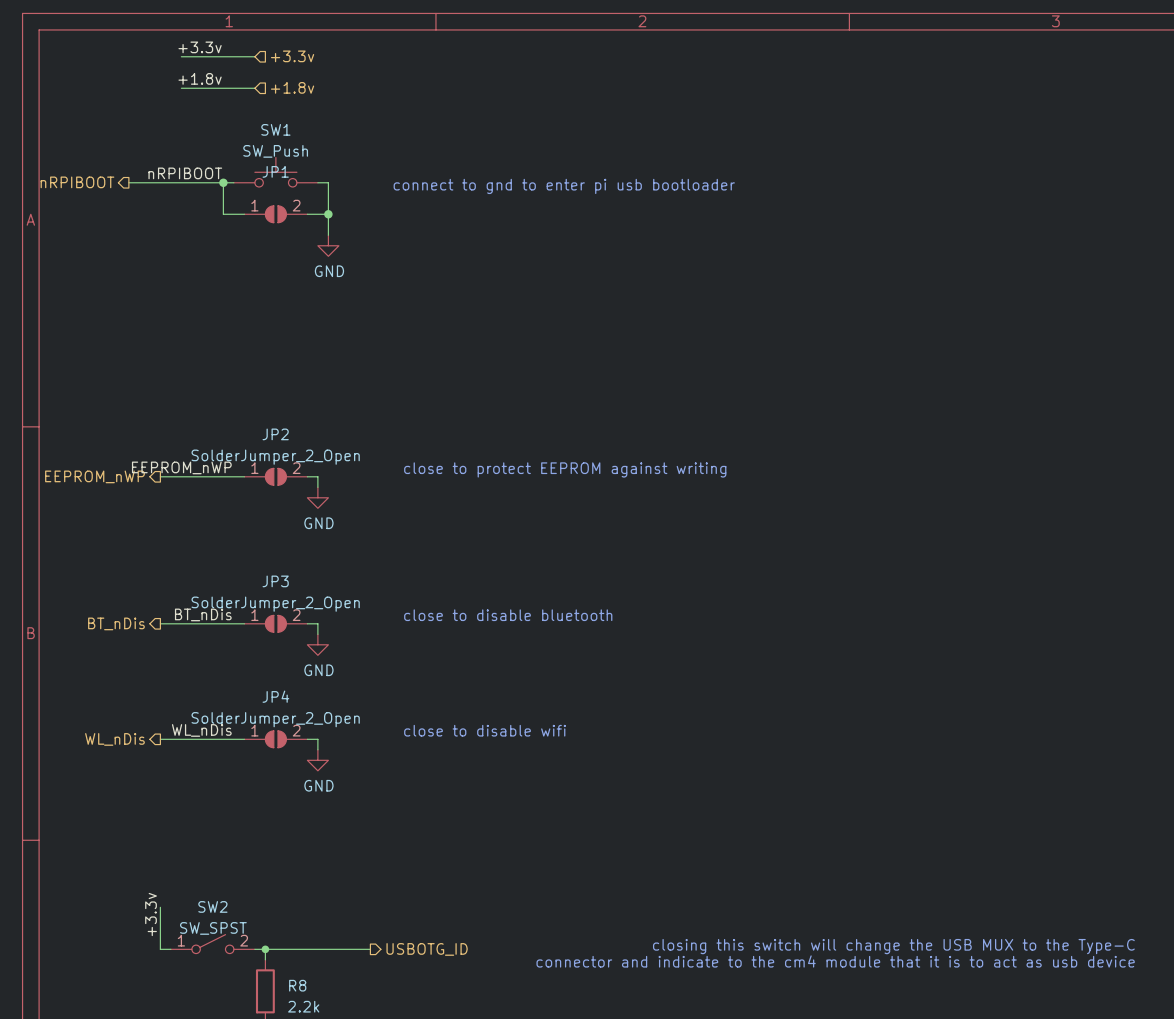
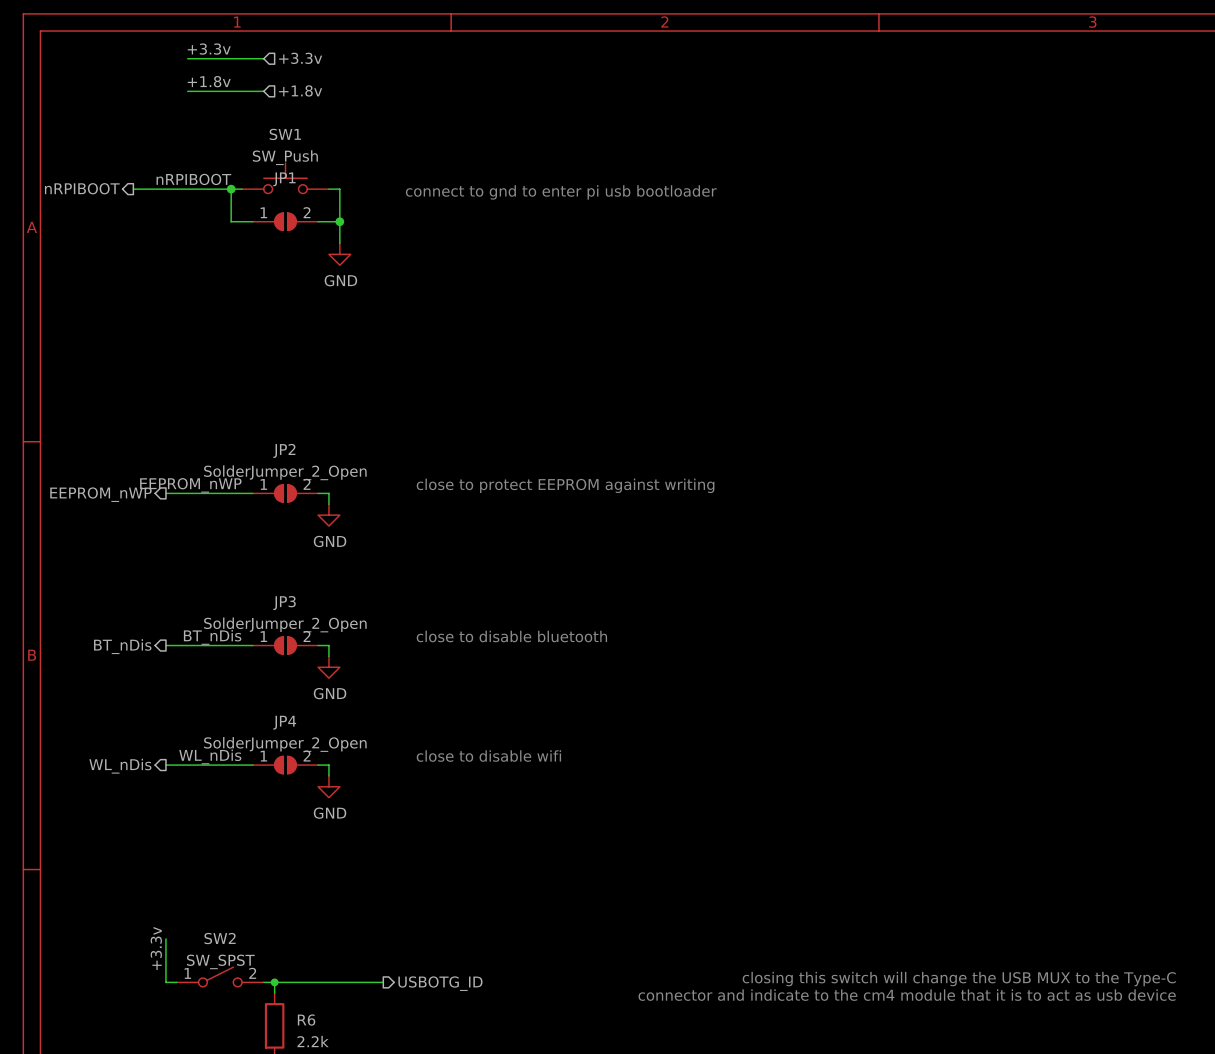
R8 name: R8 (297, 985) -> R6 (306, 1020)

